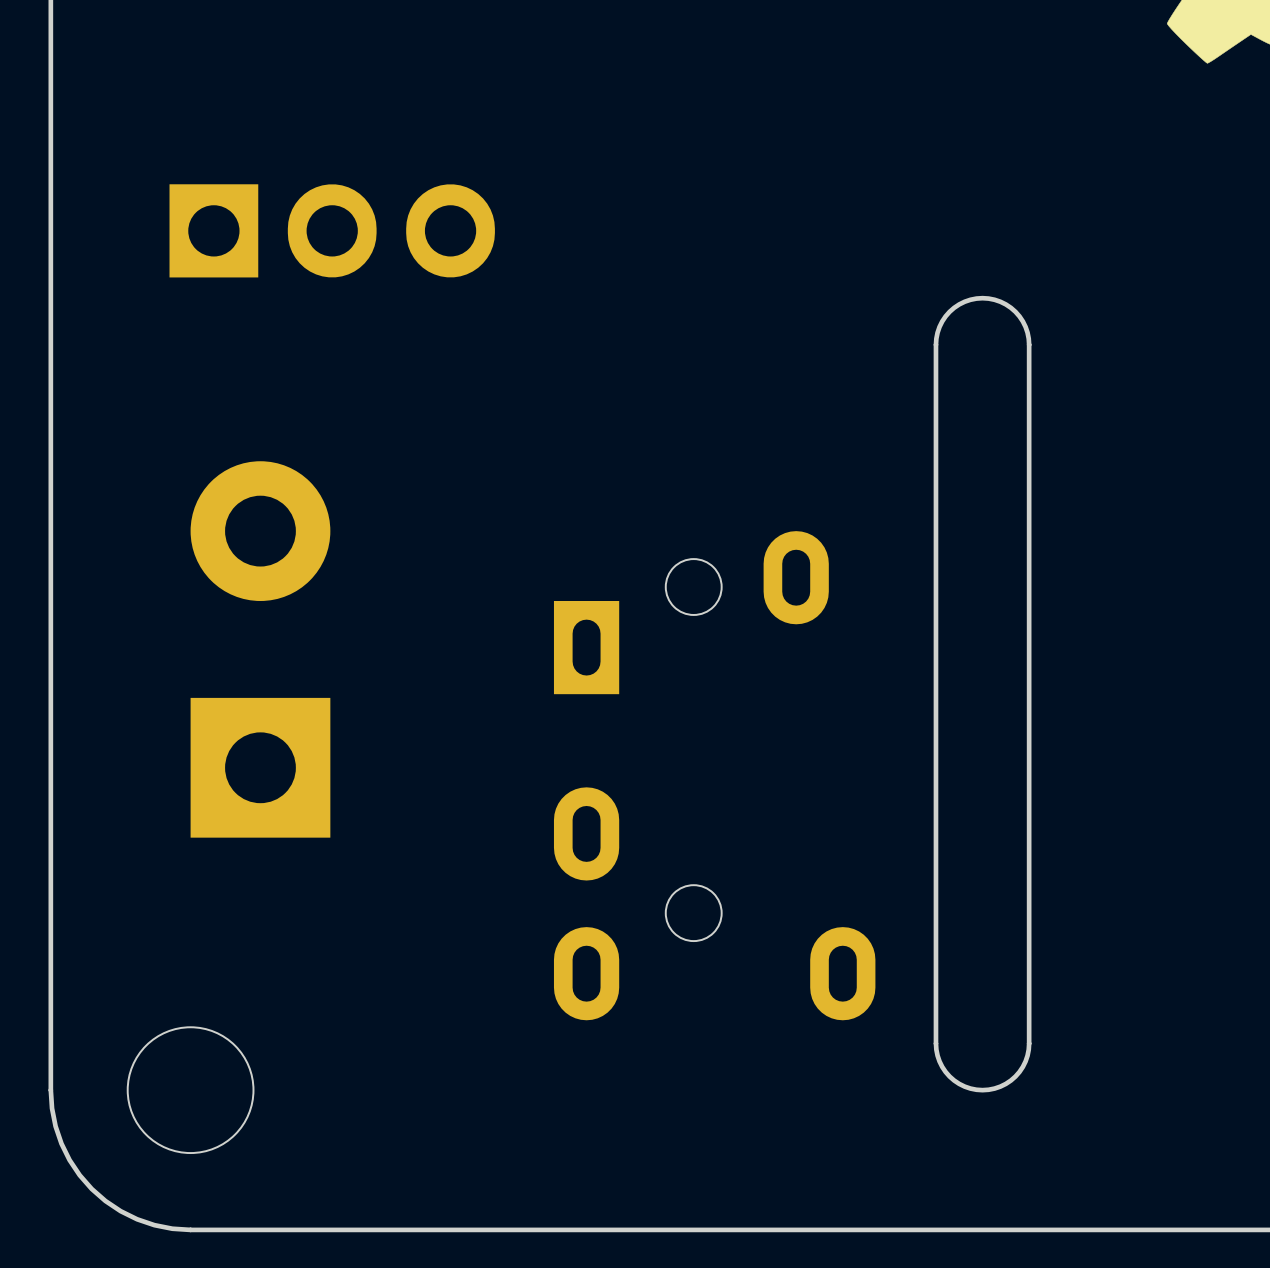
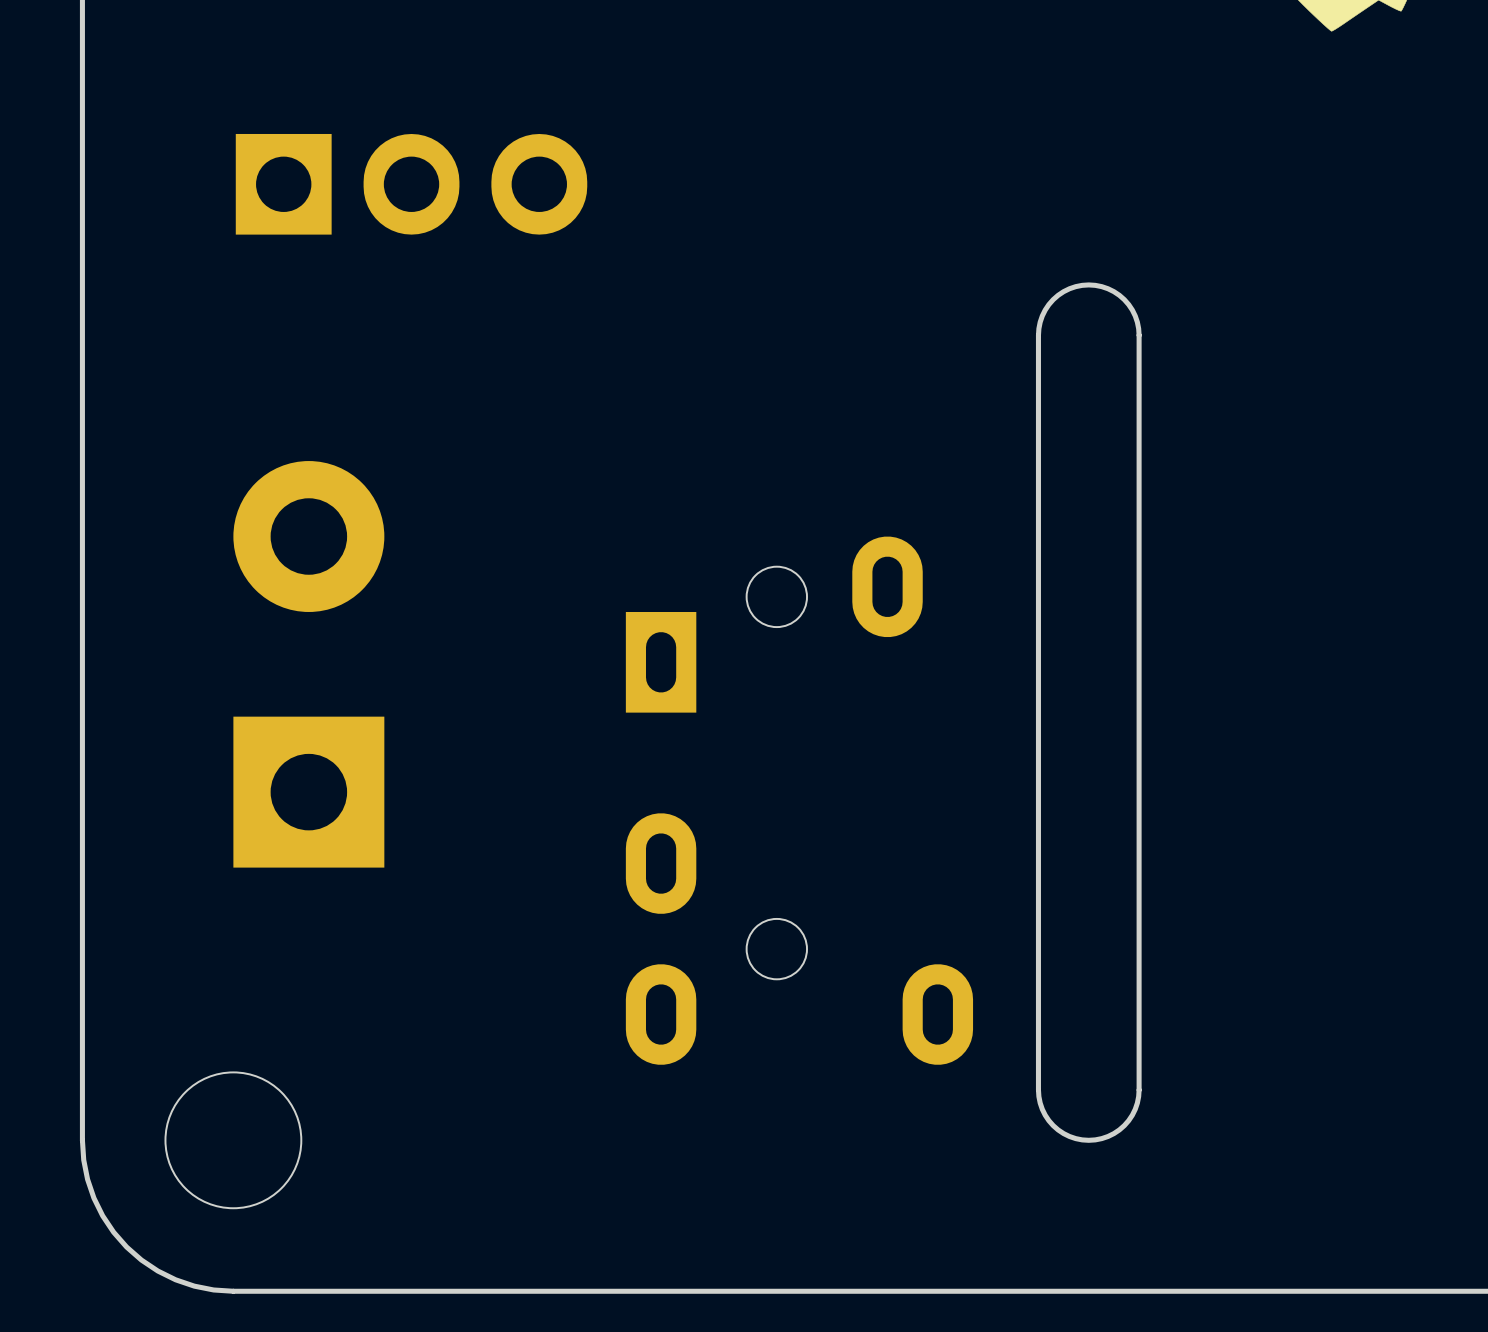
part position: (332, 230) -> (411, 184)

